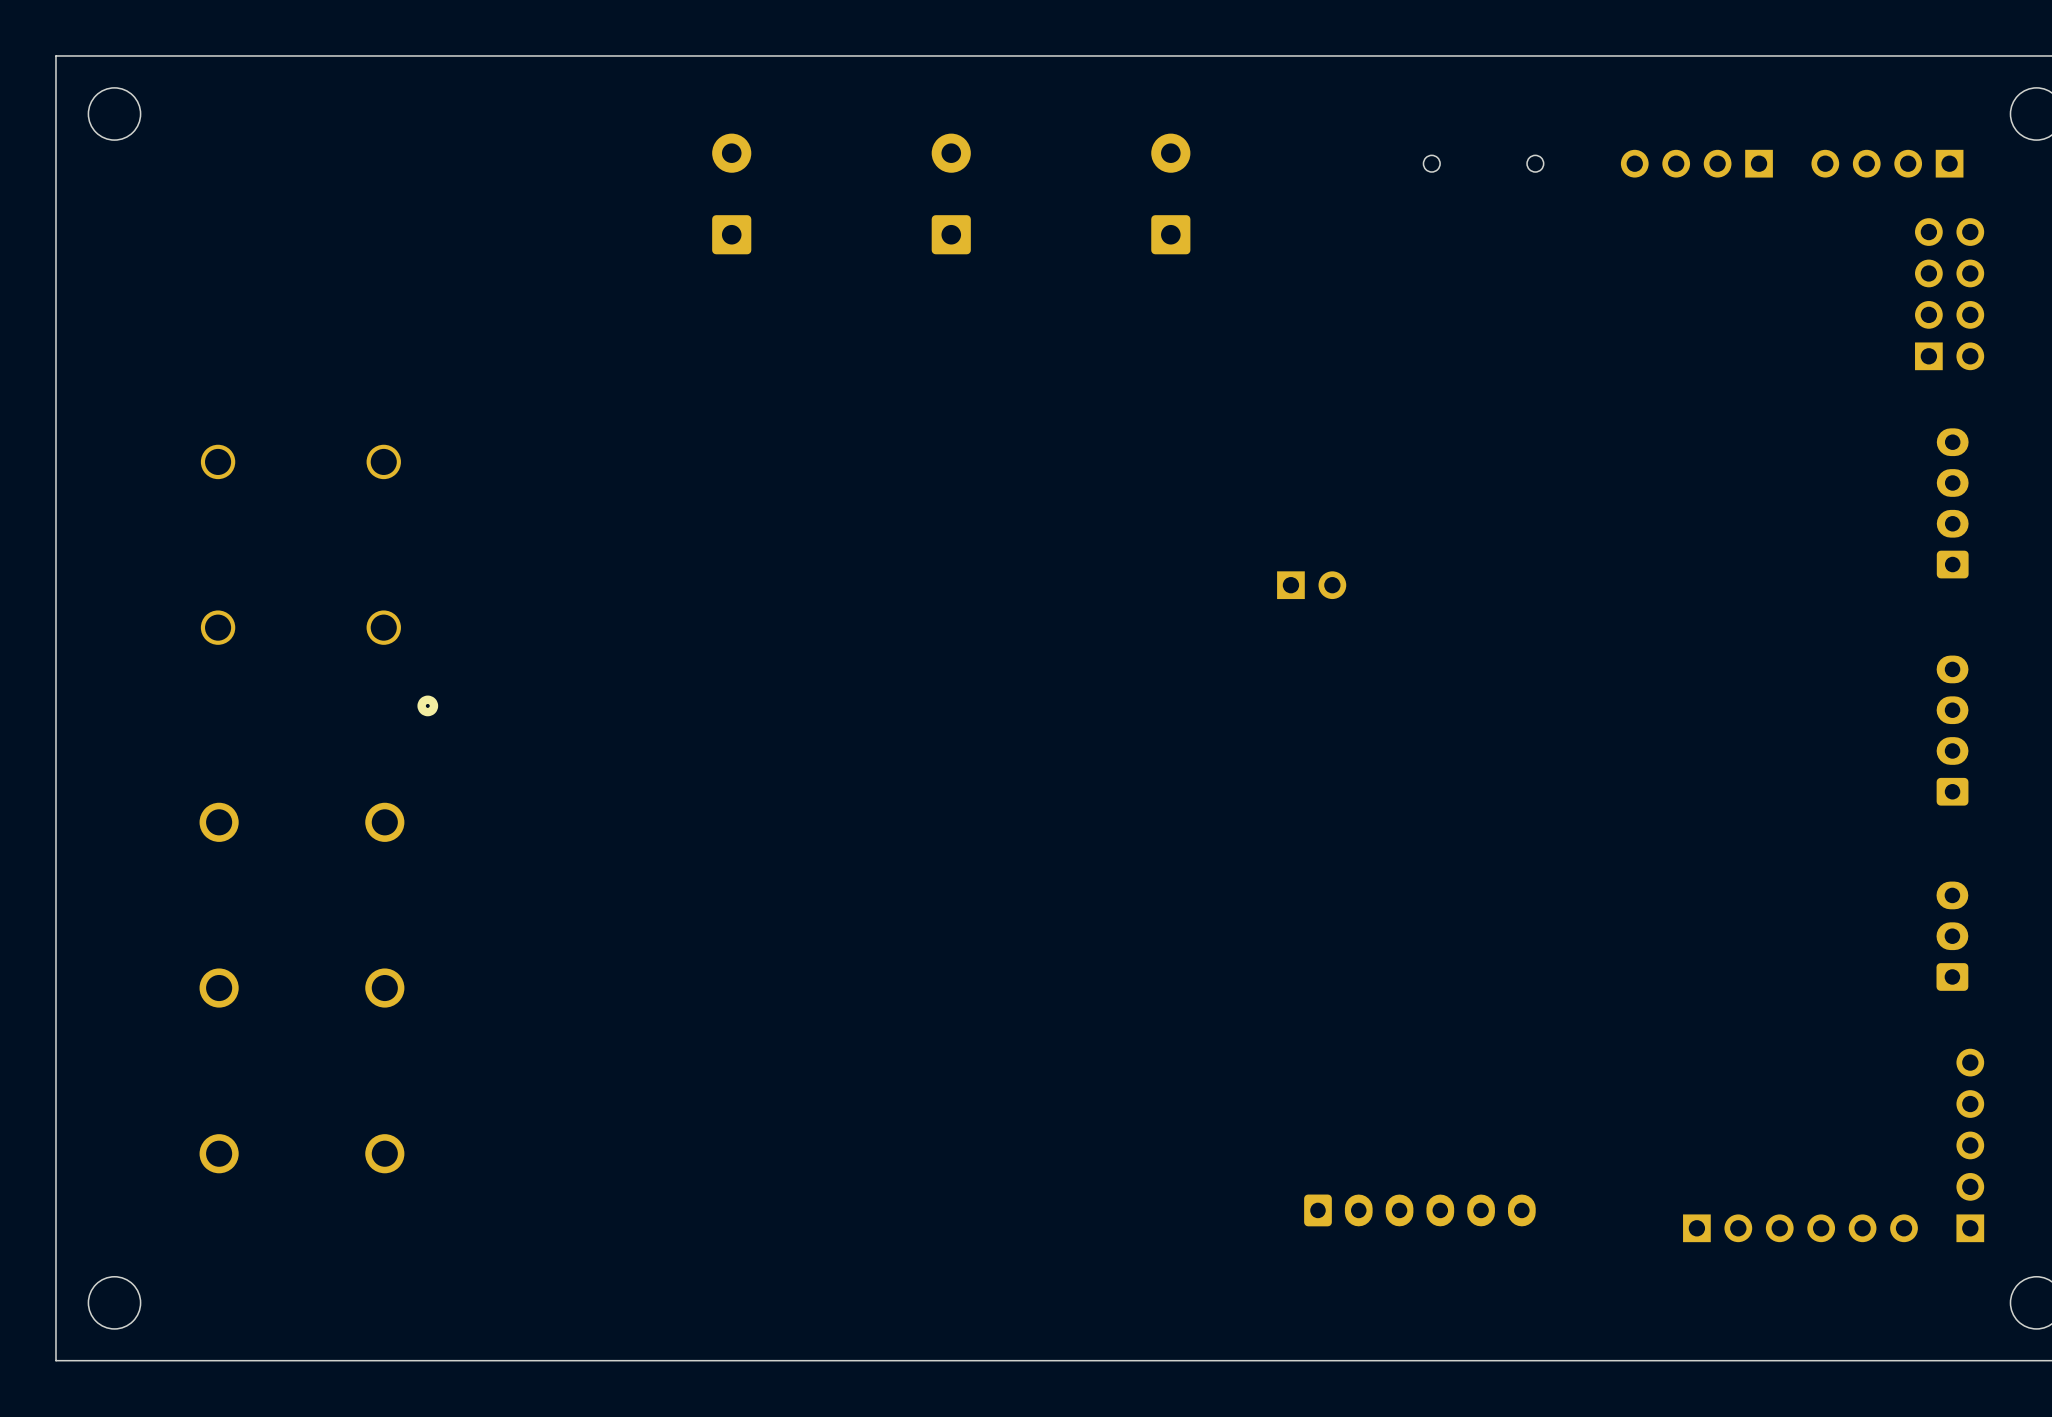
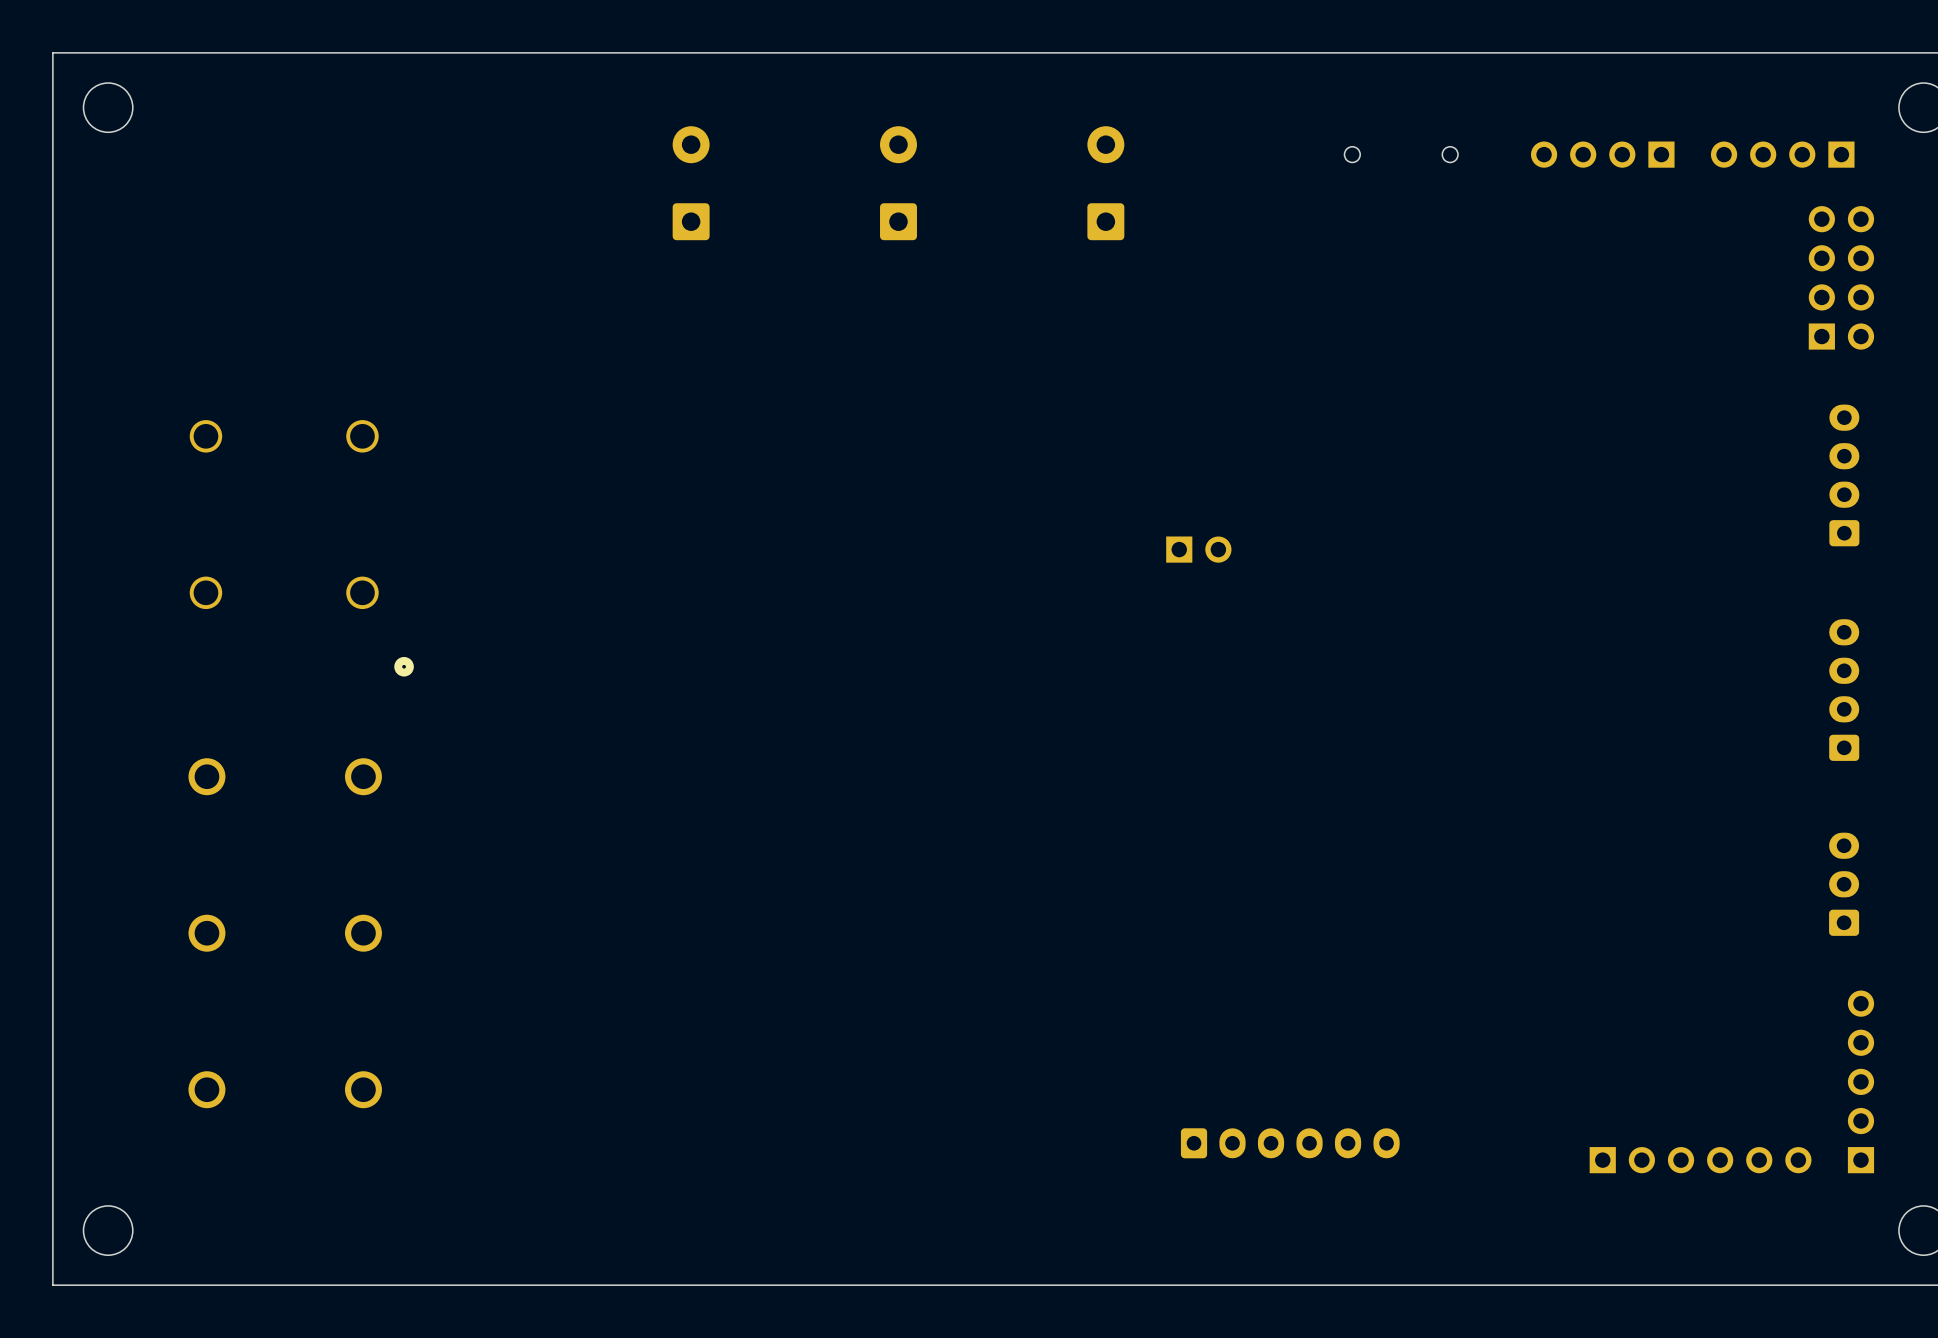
part position: (1311, 585) -> (1198, 549)
part position: (1419, 1210) -> (1290, 1143)

